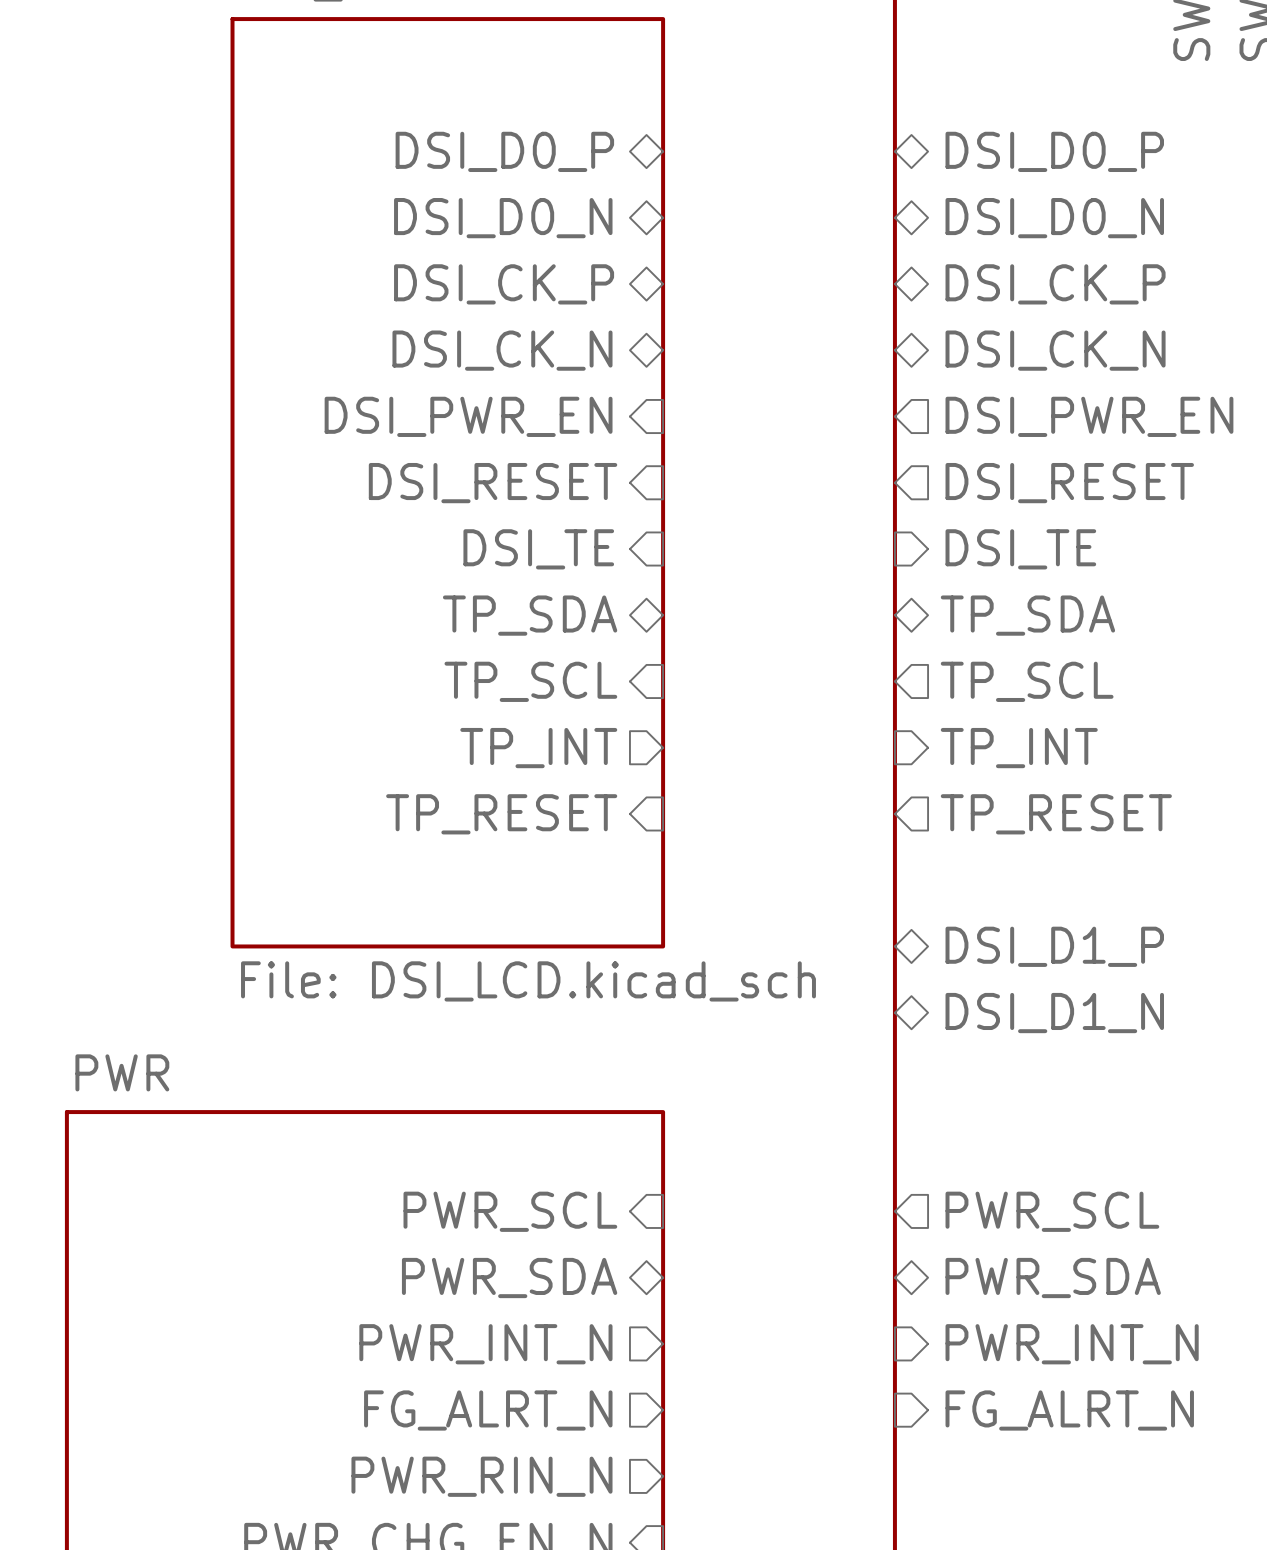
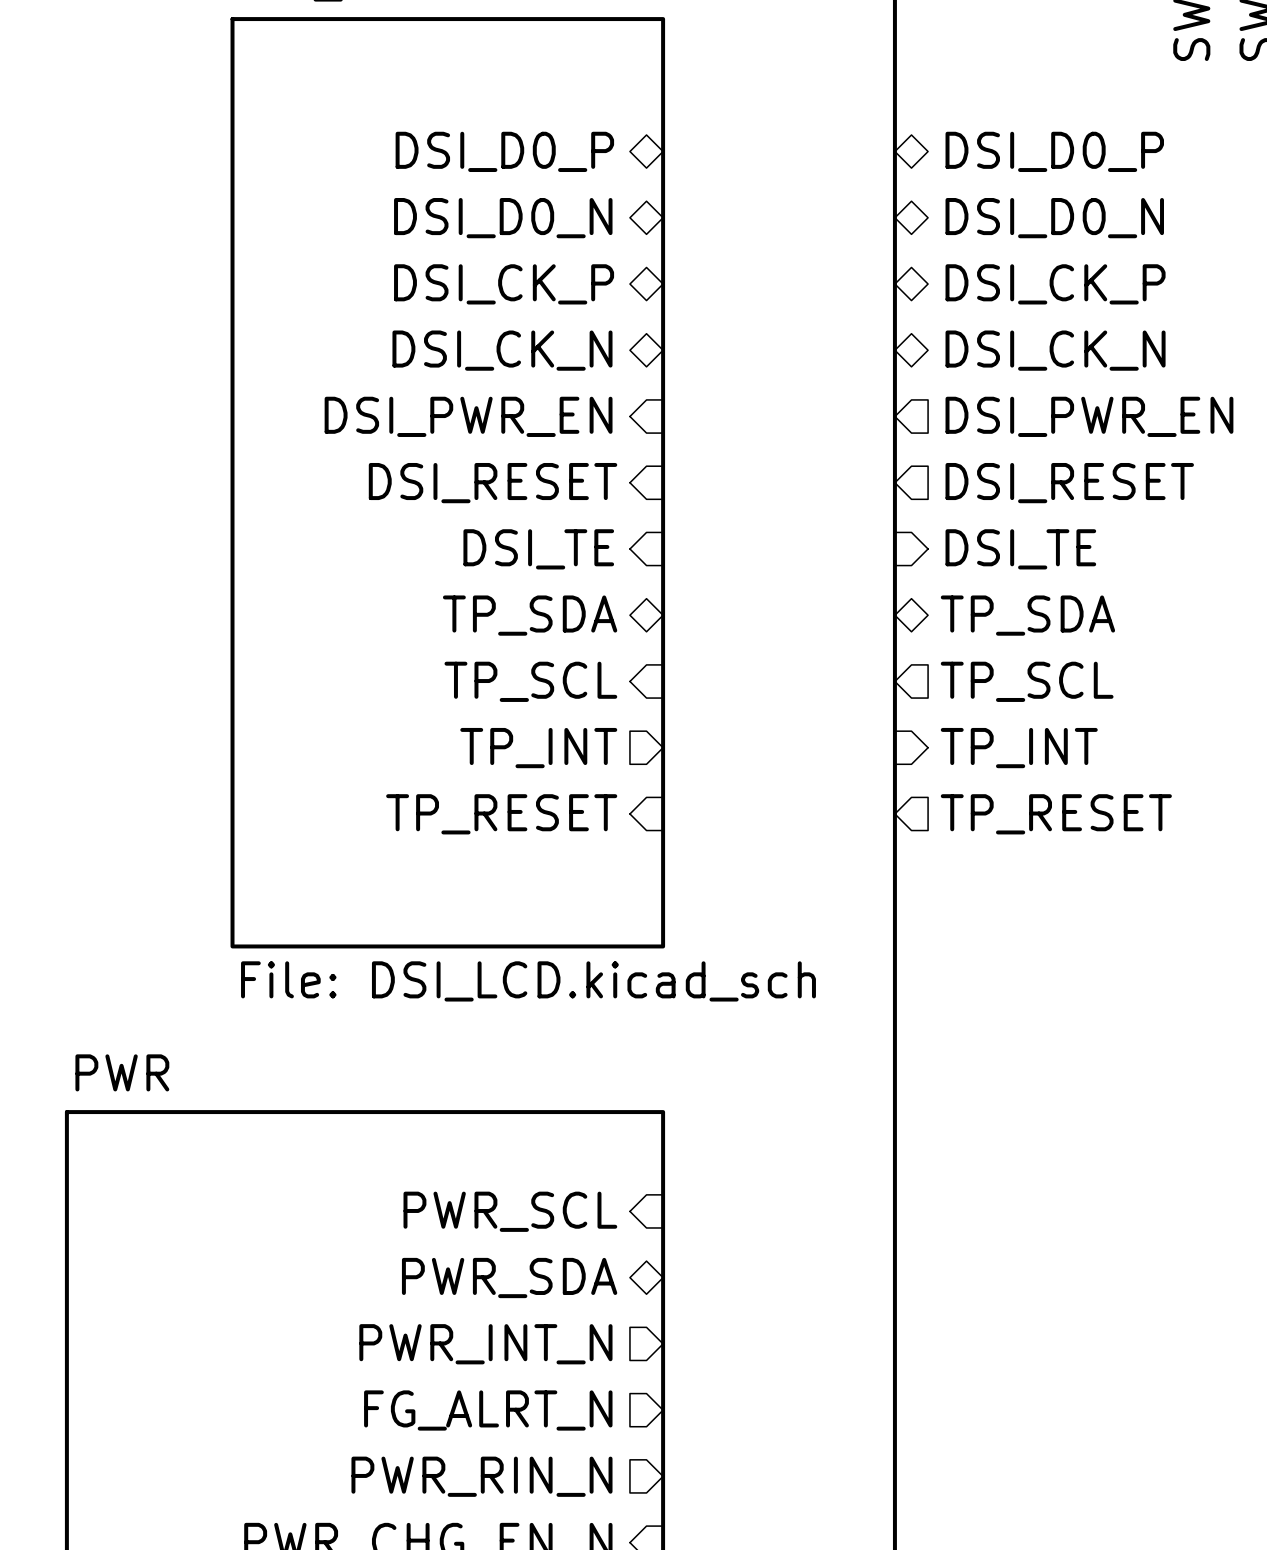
sheet pin: DSI_D1_P (1054, 946) -> none
sheet pin: DSI_D1_N (1054, 1013) -> none
sheet pin: PWR_SCL (1052, 1211) -> none
sheet pin: PWR_SDA (1053, 1278) -> none
sheet pin: PWR_INT_N (1072, 1344) -> none
sheet pin: FG_ALRT_N (1069, 1410) -> none

